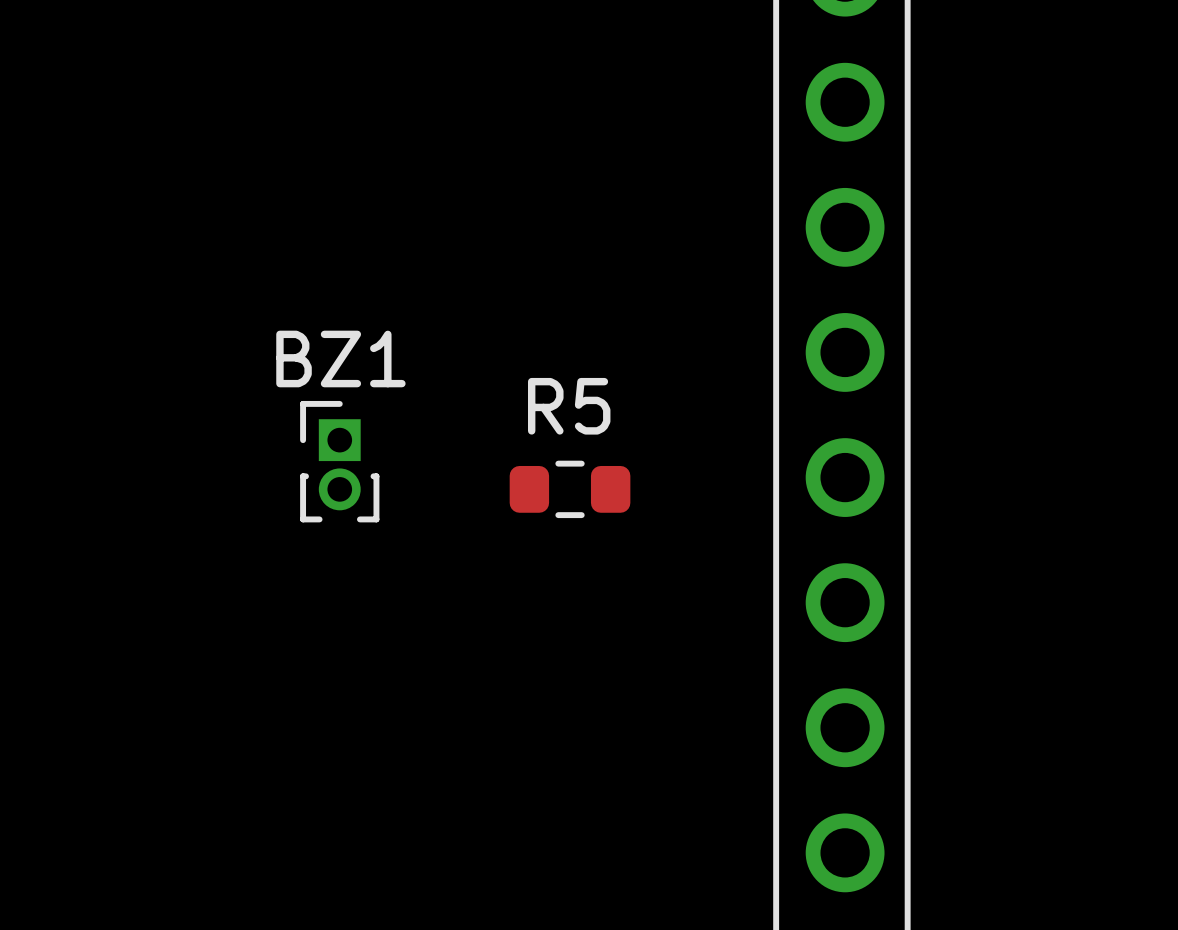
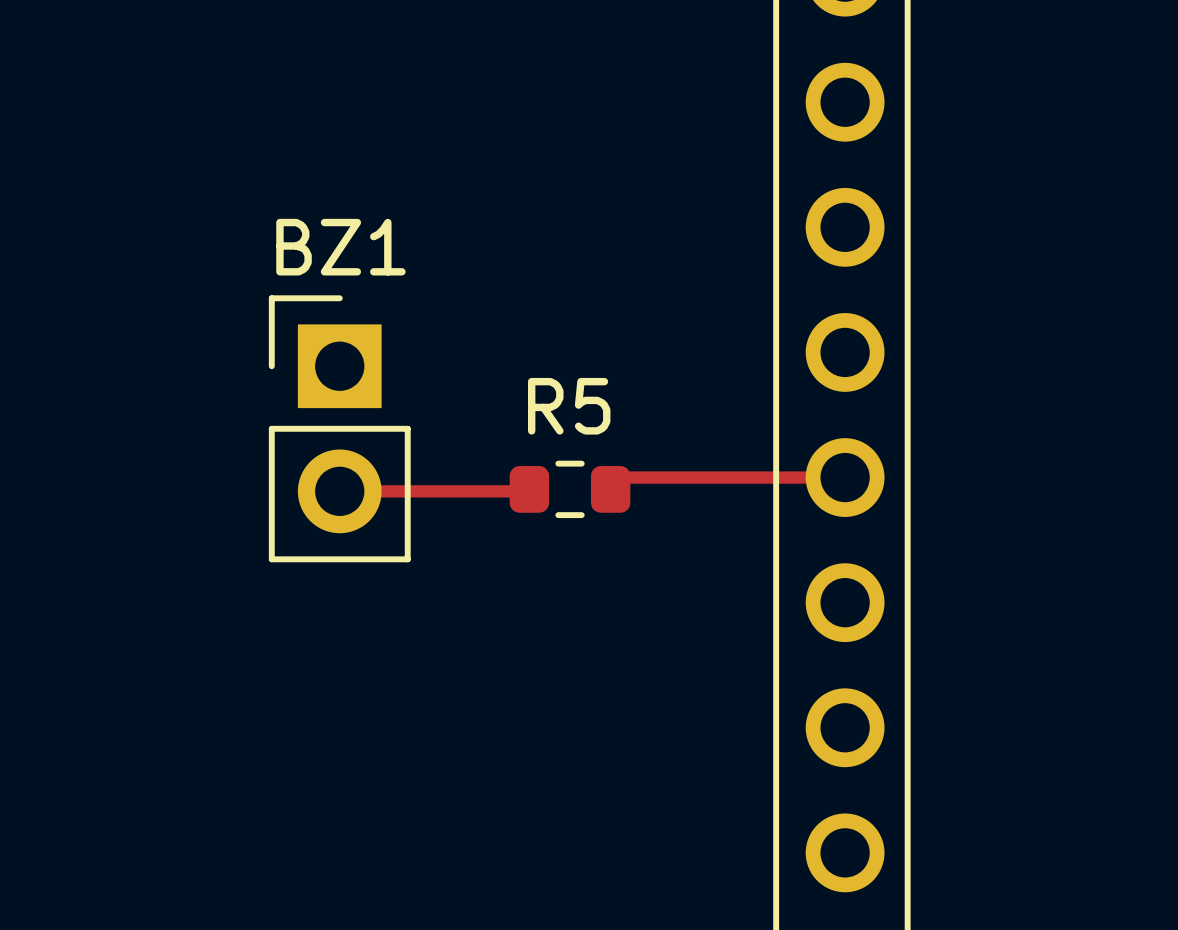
BZ1 footprint: [300, 400, 380, 523] -> [268, 295, 411, 563]
track: none -> (845, 477) (622, 477) (610, 489)
track: none -> (529, 489) (527, 491) (339, 491)

